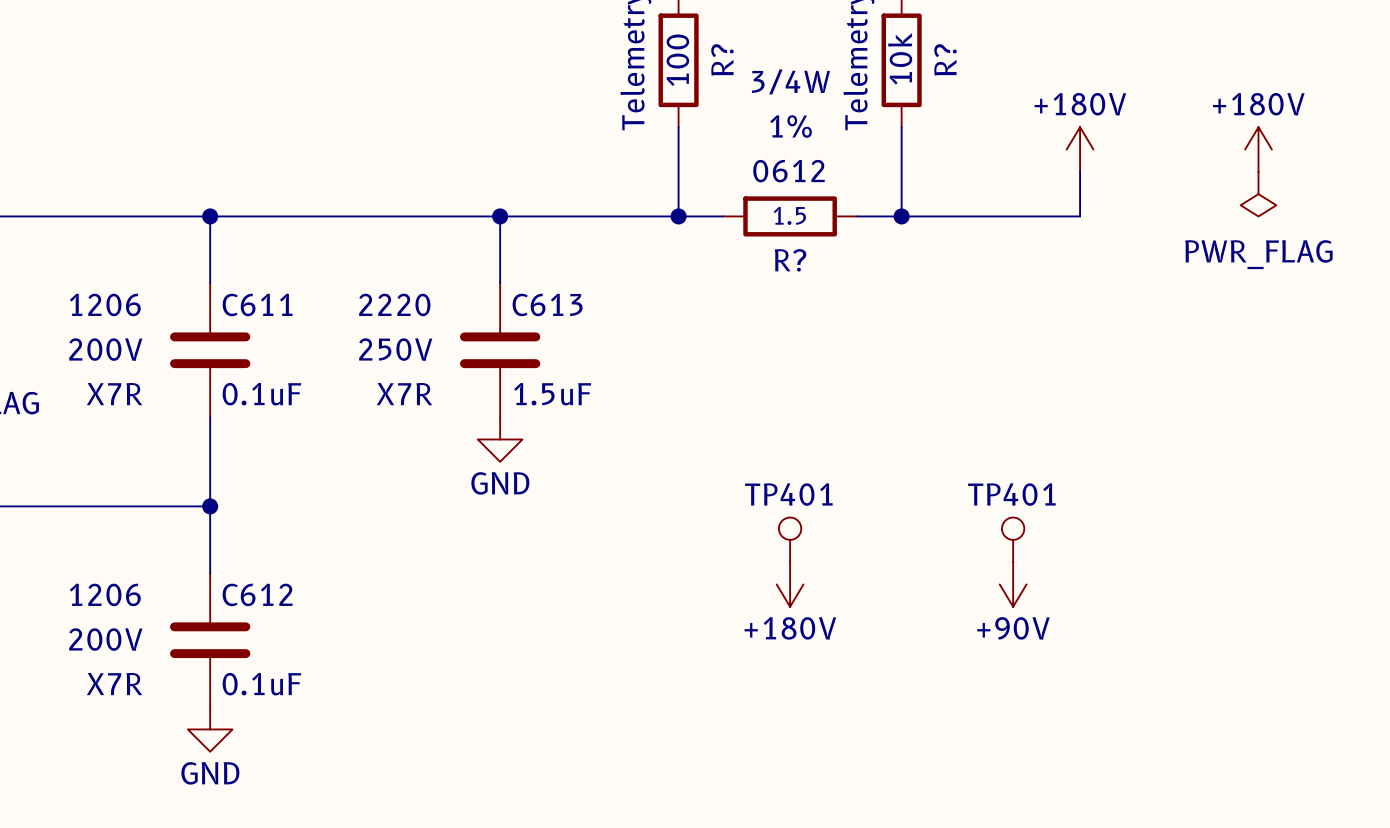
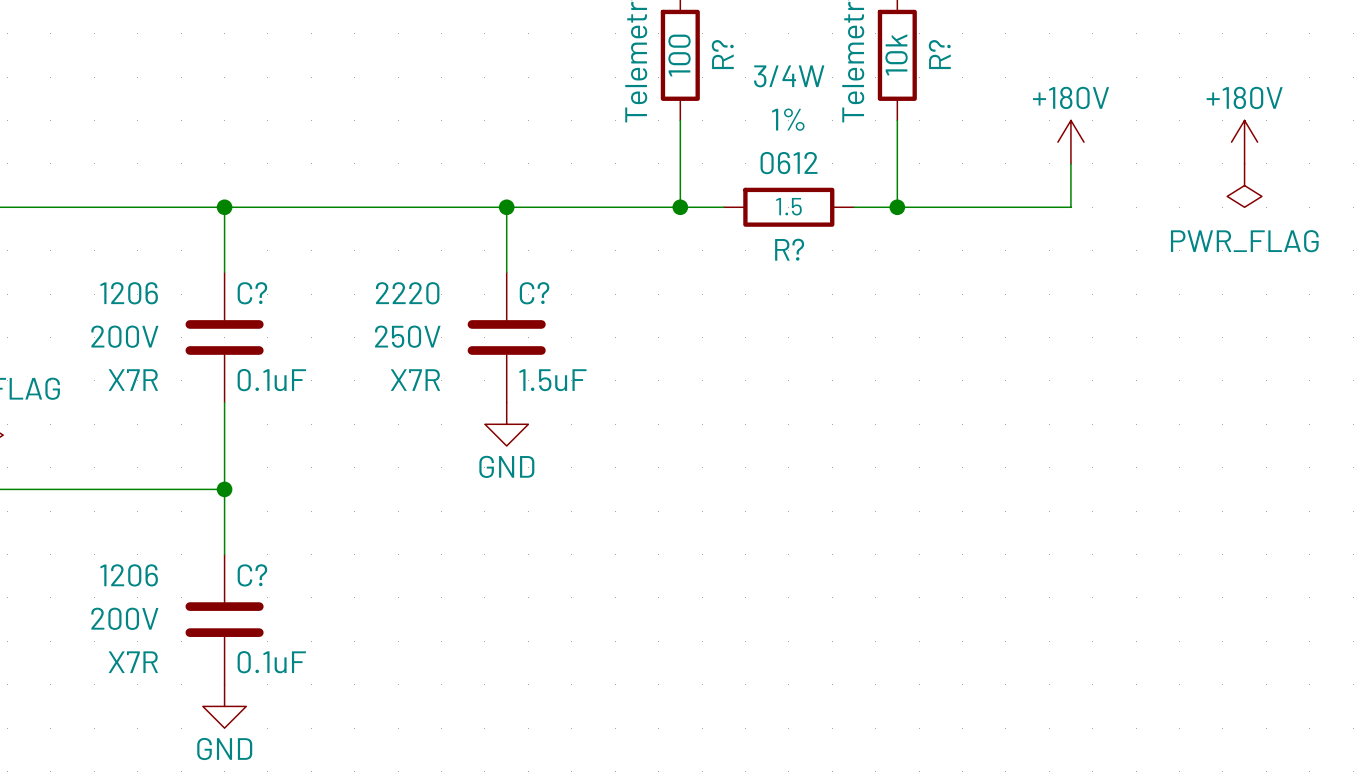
C611 name: C611 (257, 304) -> C? (252, 293)
C613 name: C613 (547, 304) -> C? (534, 293)
TP401: (790, 539) -> none
TP401: (1013, 539) -> none
power symbol: +180V (790, 584) -> none
power symbol: +90V (1013, 584) -> none
C612 name: C612 (257, 594) -> C? (252, 575)

